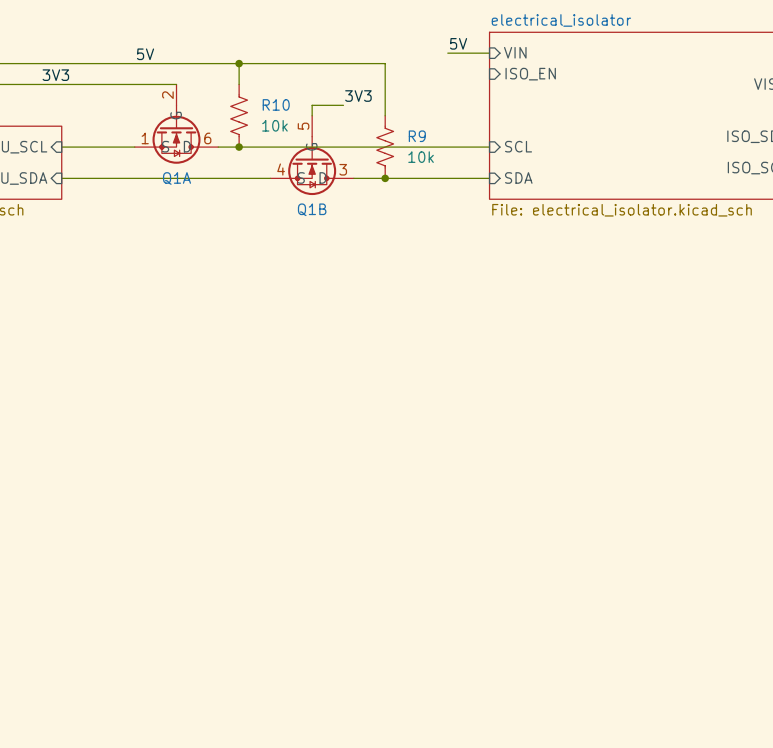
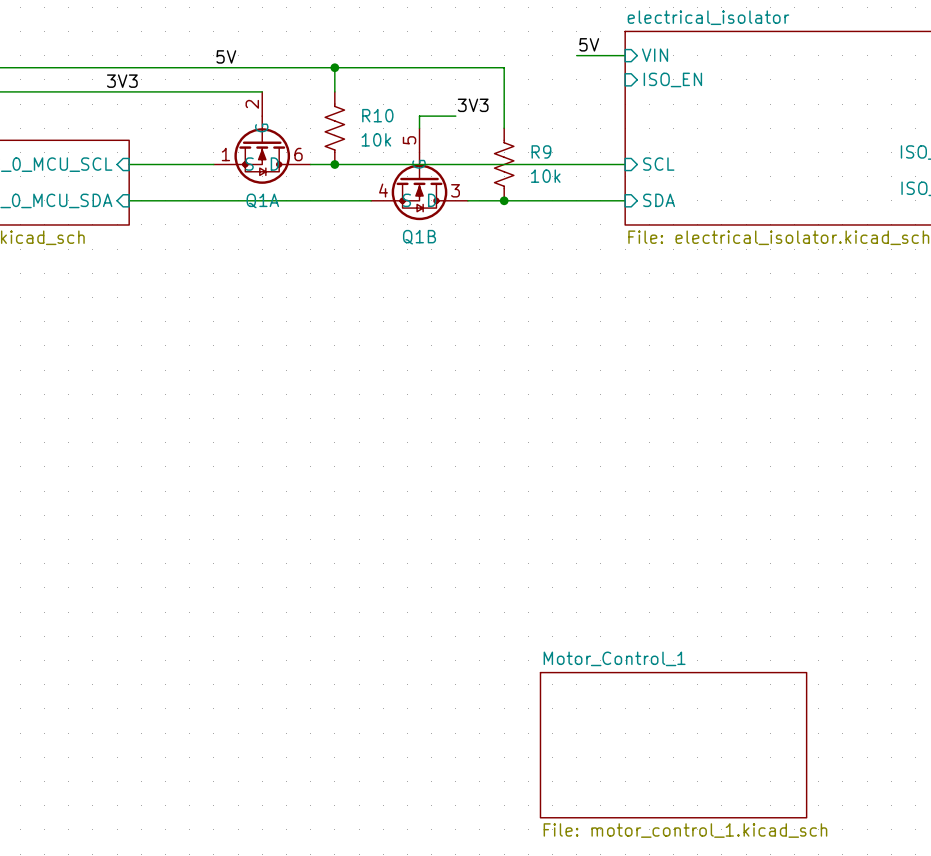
sheet Motor_Control_1: none -> File: motor_control_1.kicad_sch (673, 745)

